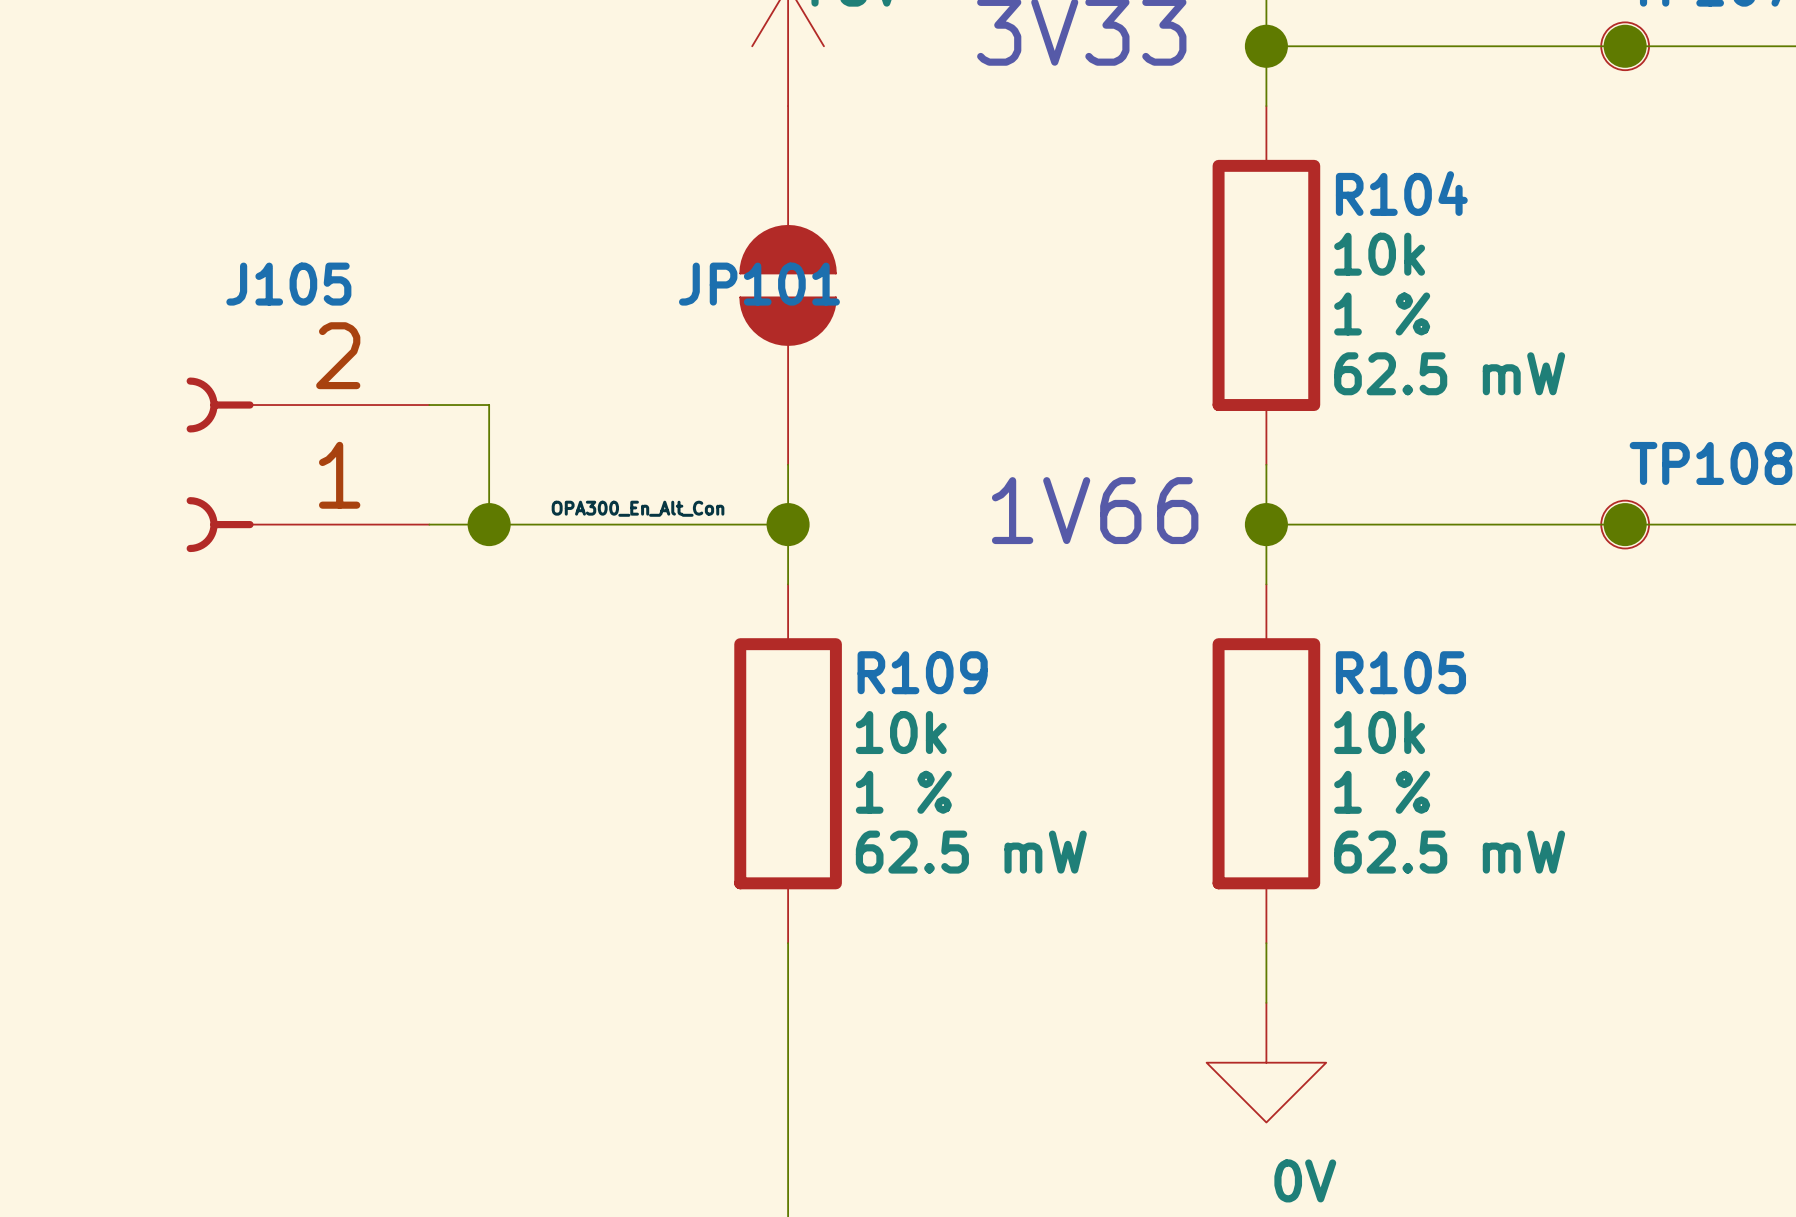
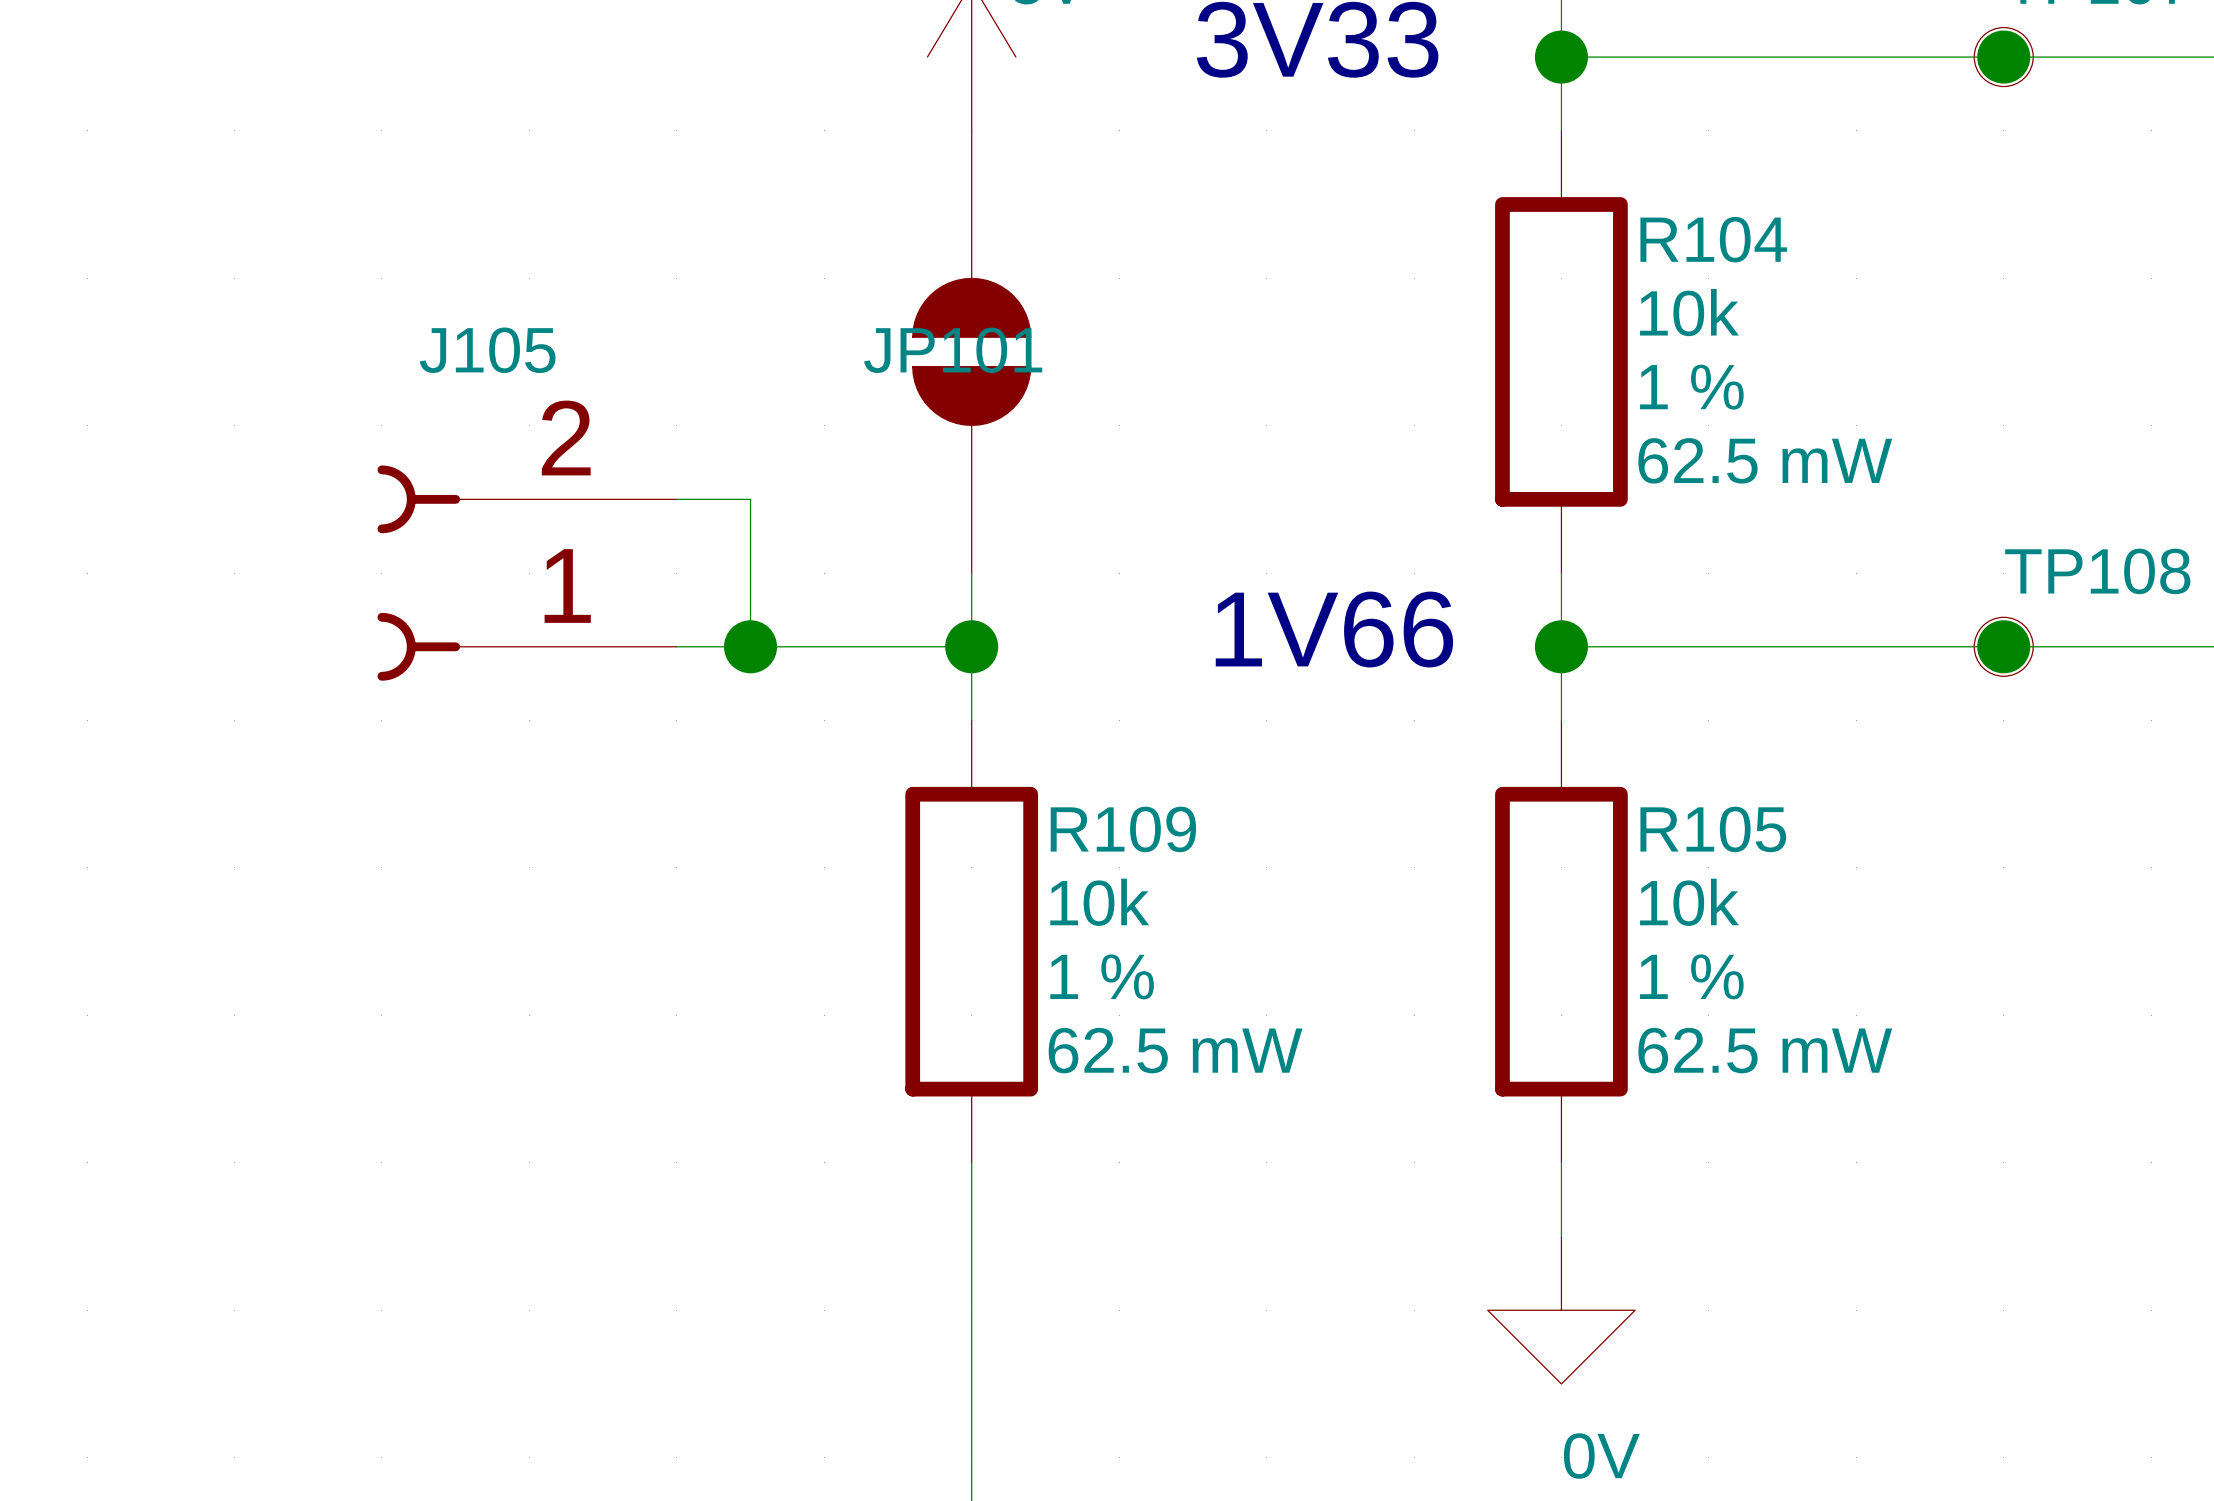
wire: (429, 405) (489, 405) (489, 524) -> (676, 499) (750, 499) (750, 646)
J105 position: (307, 464) -> (527, 573)
label: OPA300_En_Alt_Con (638, 508) -> none
junction position: (489, 524) -> (750, 646)

